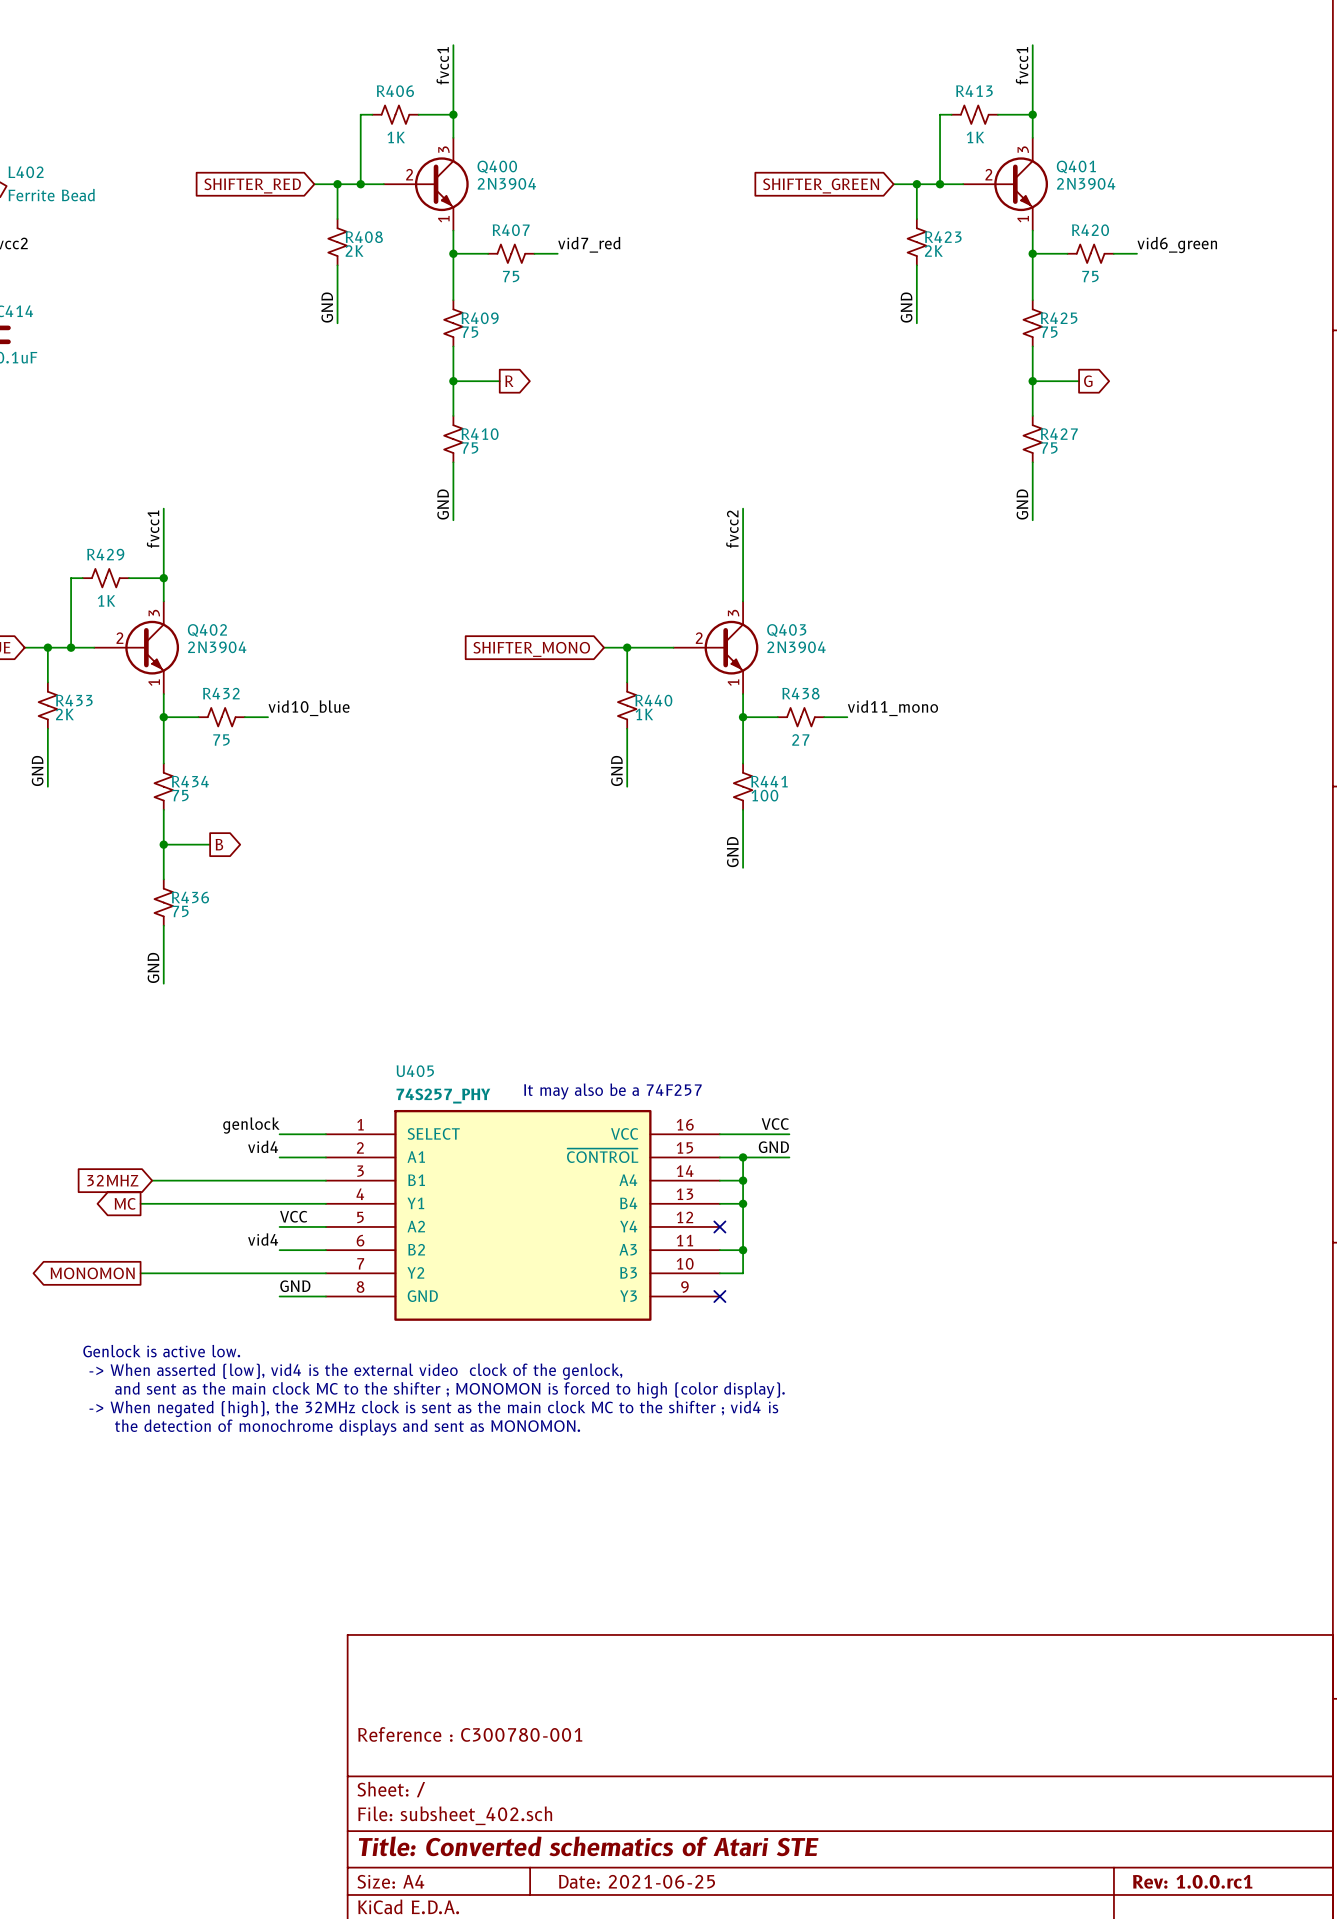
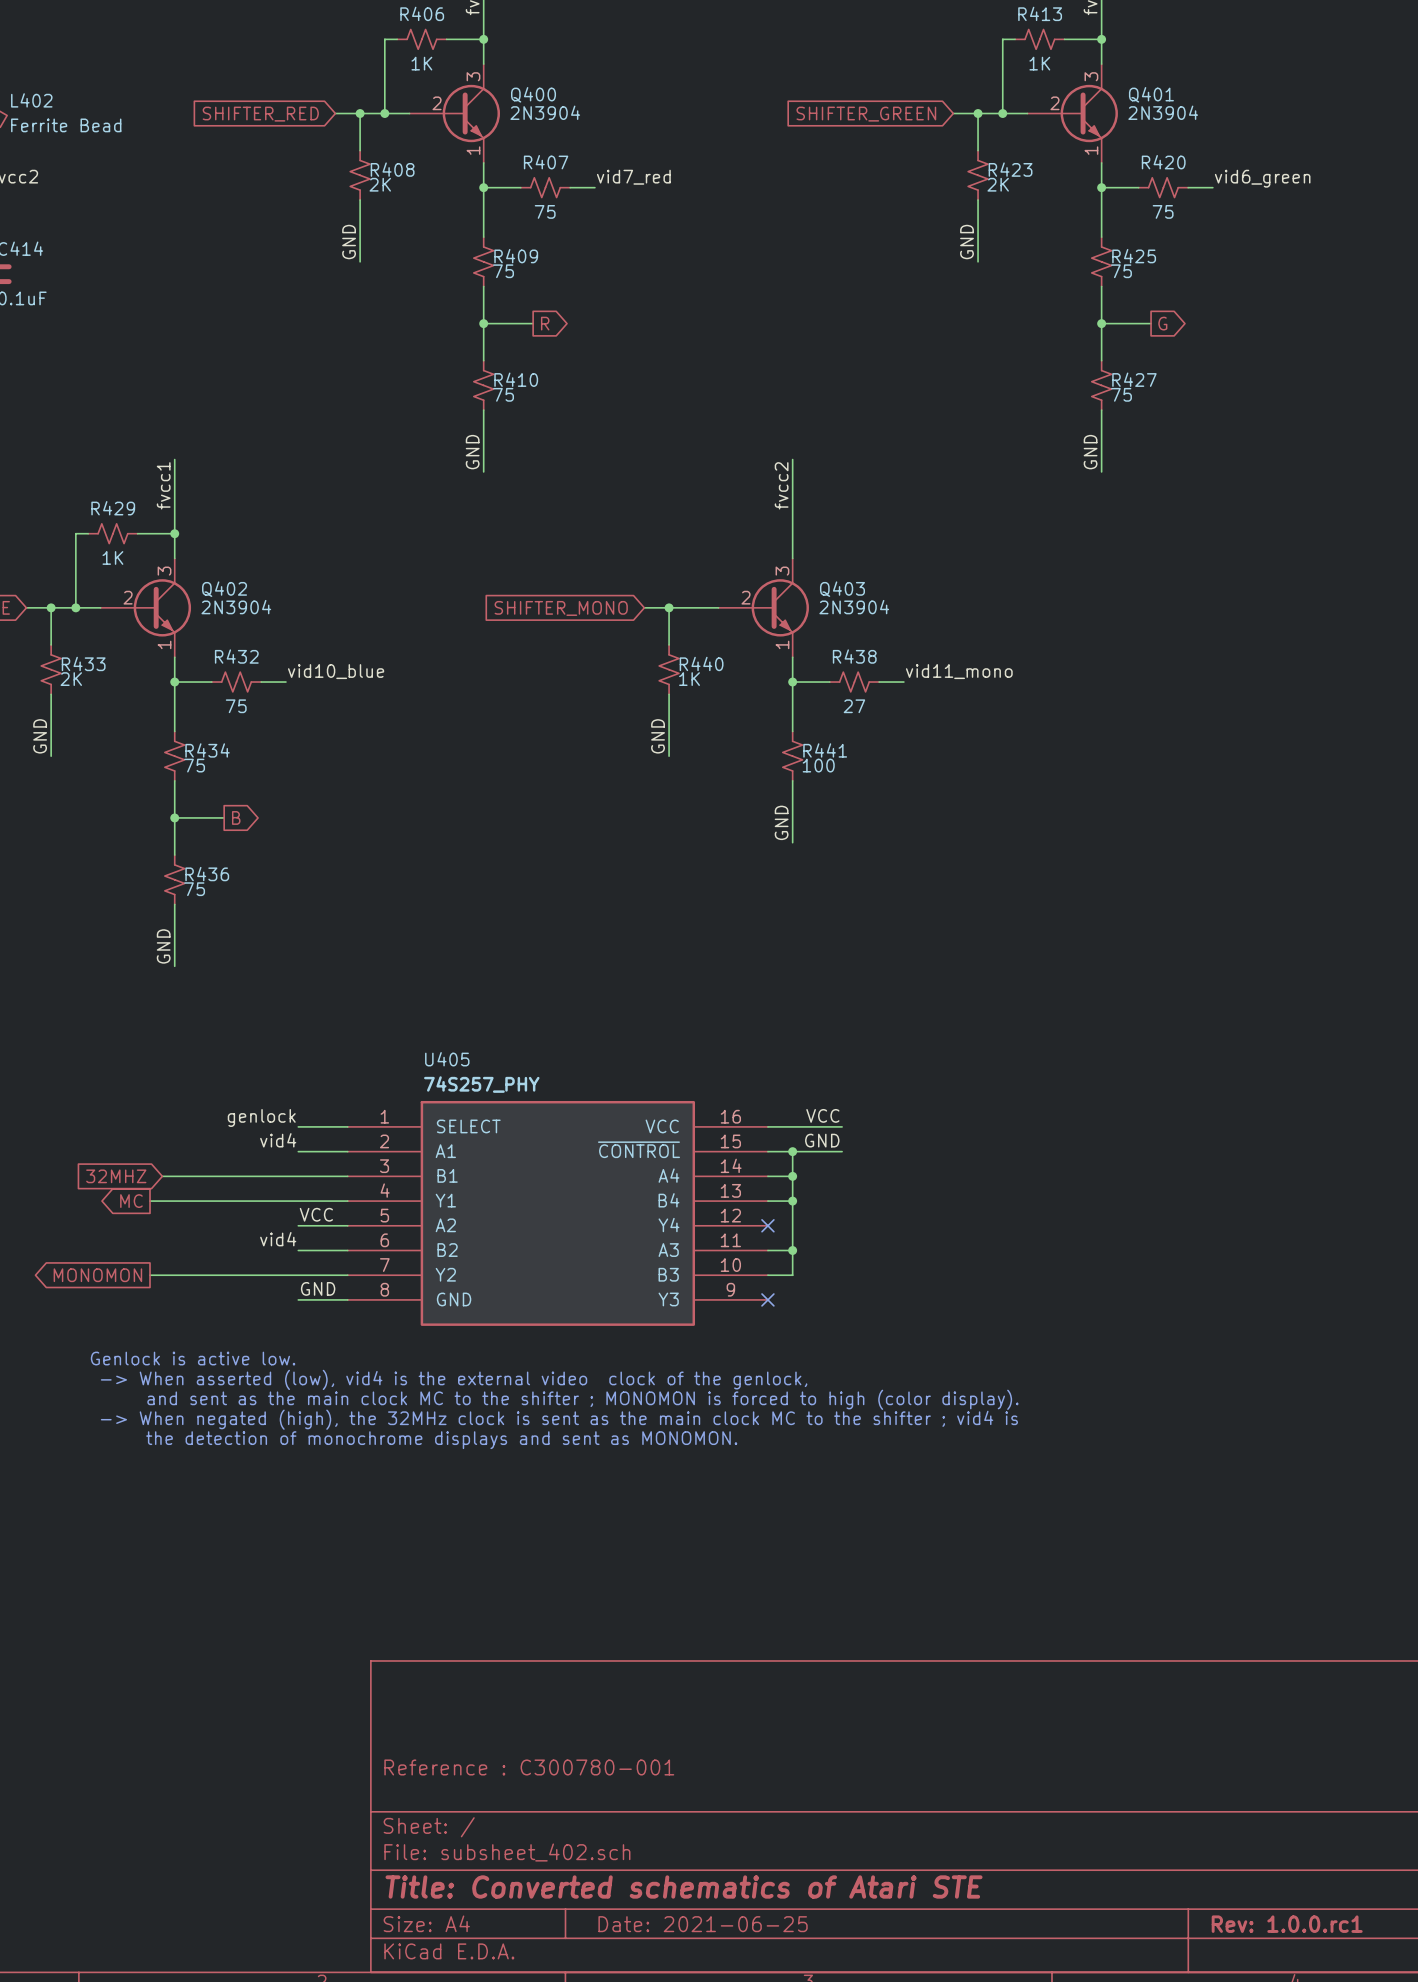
text: It may also be a 74F257 (612, 1091) -> none

